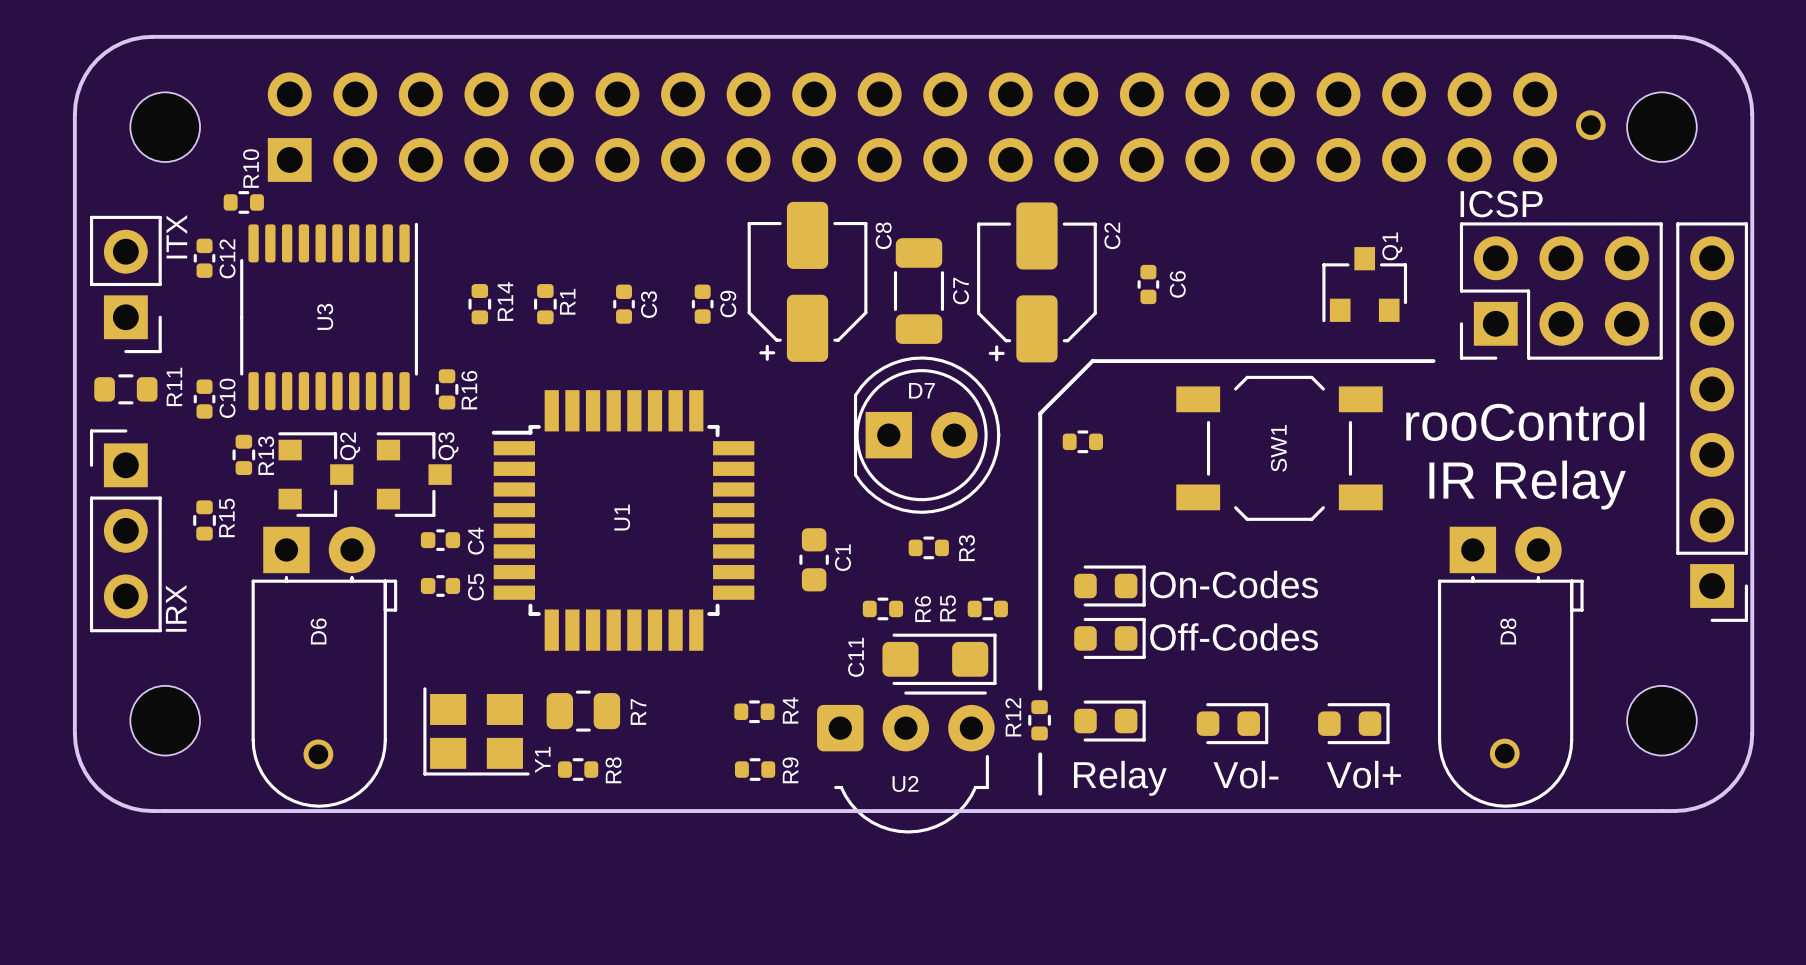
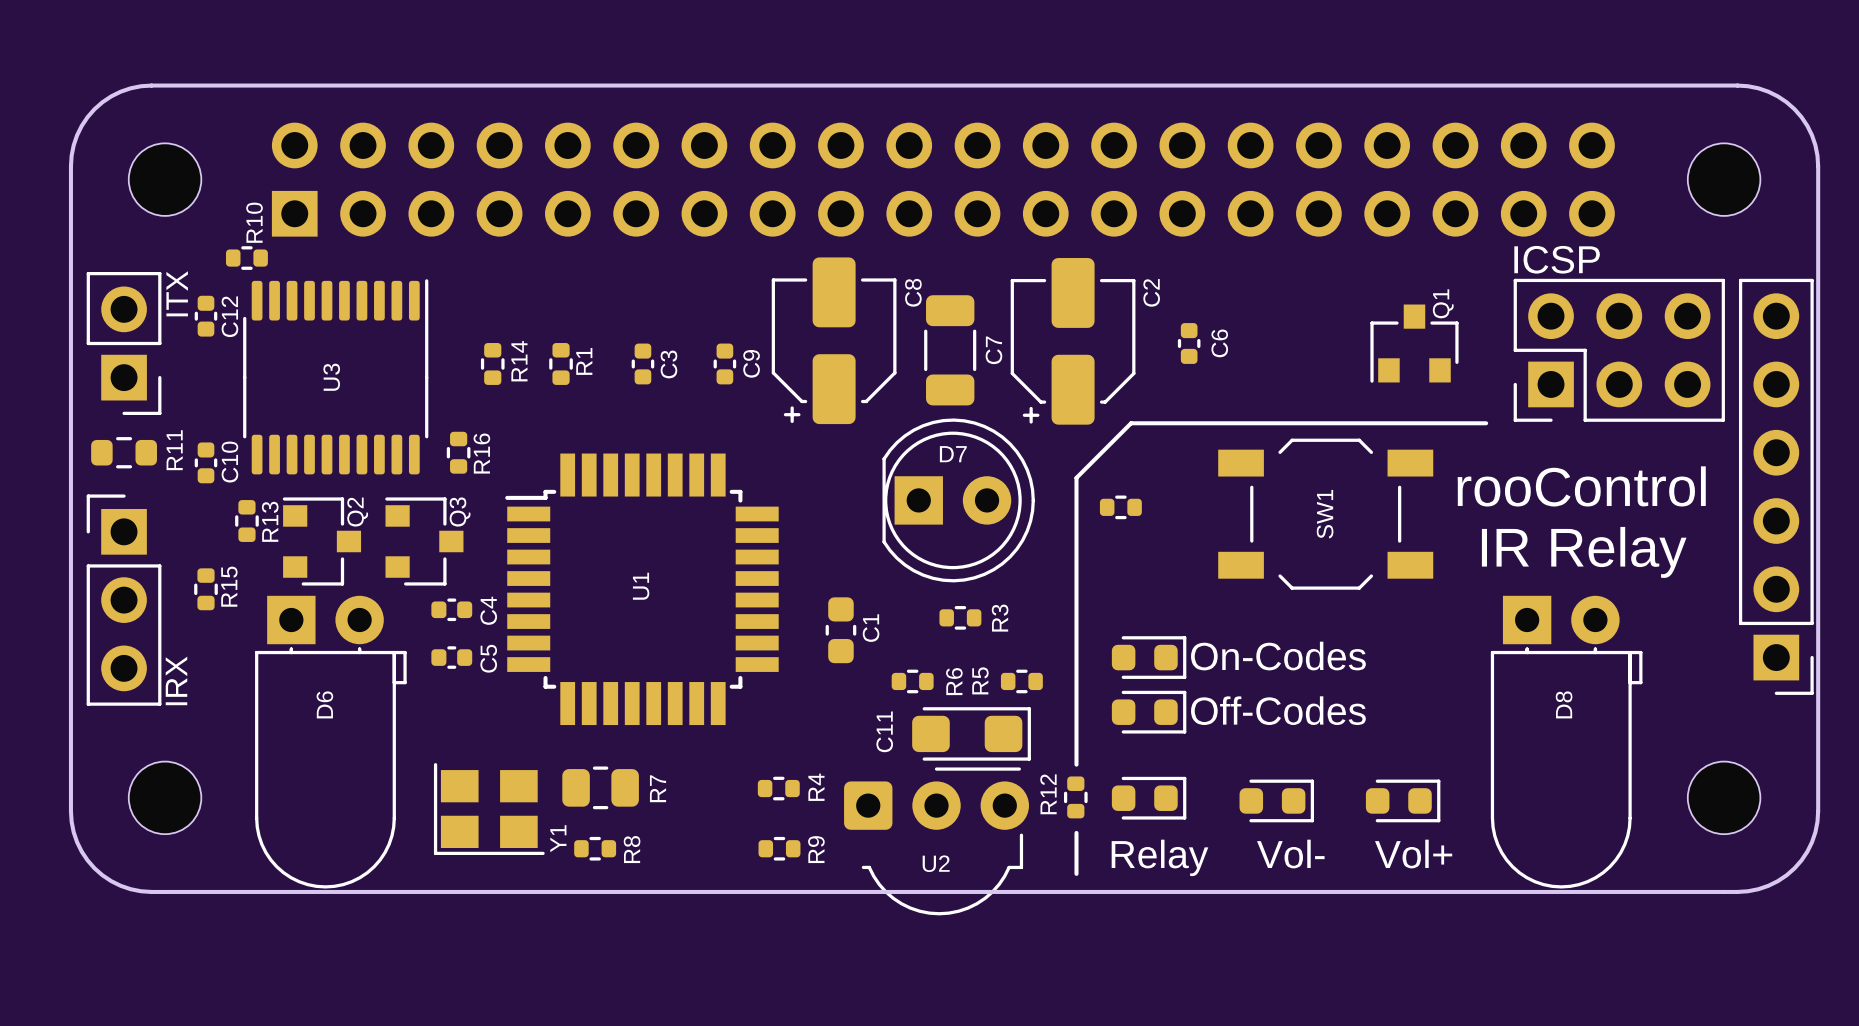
part: (1590, 125) -> none
part: (1504, 753) -> none
part: (318, 754) -> none

